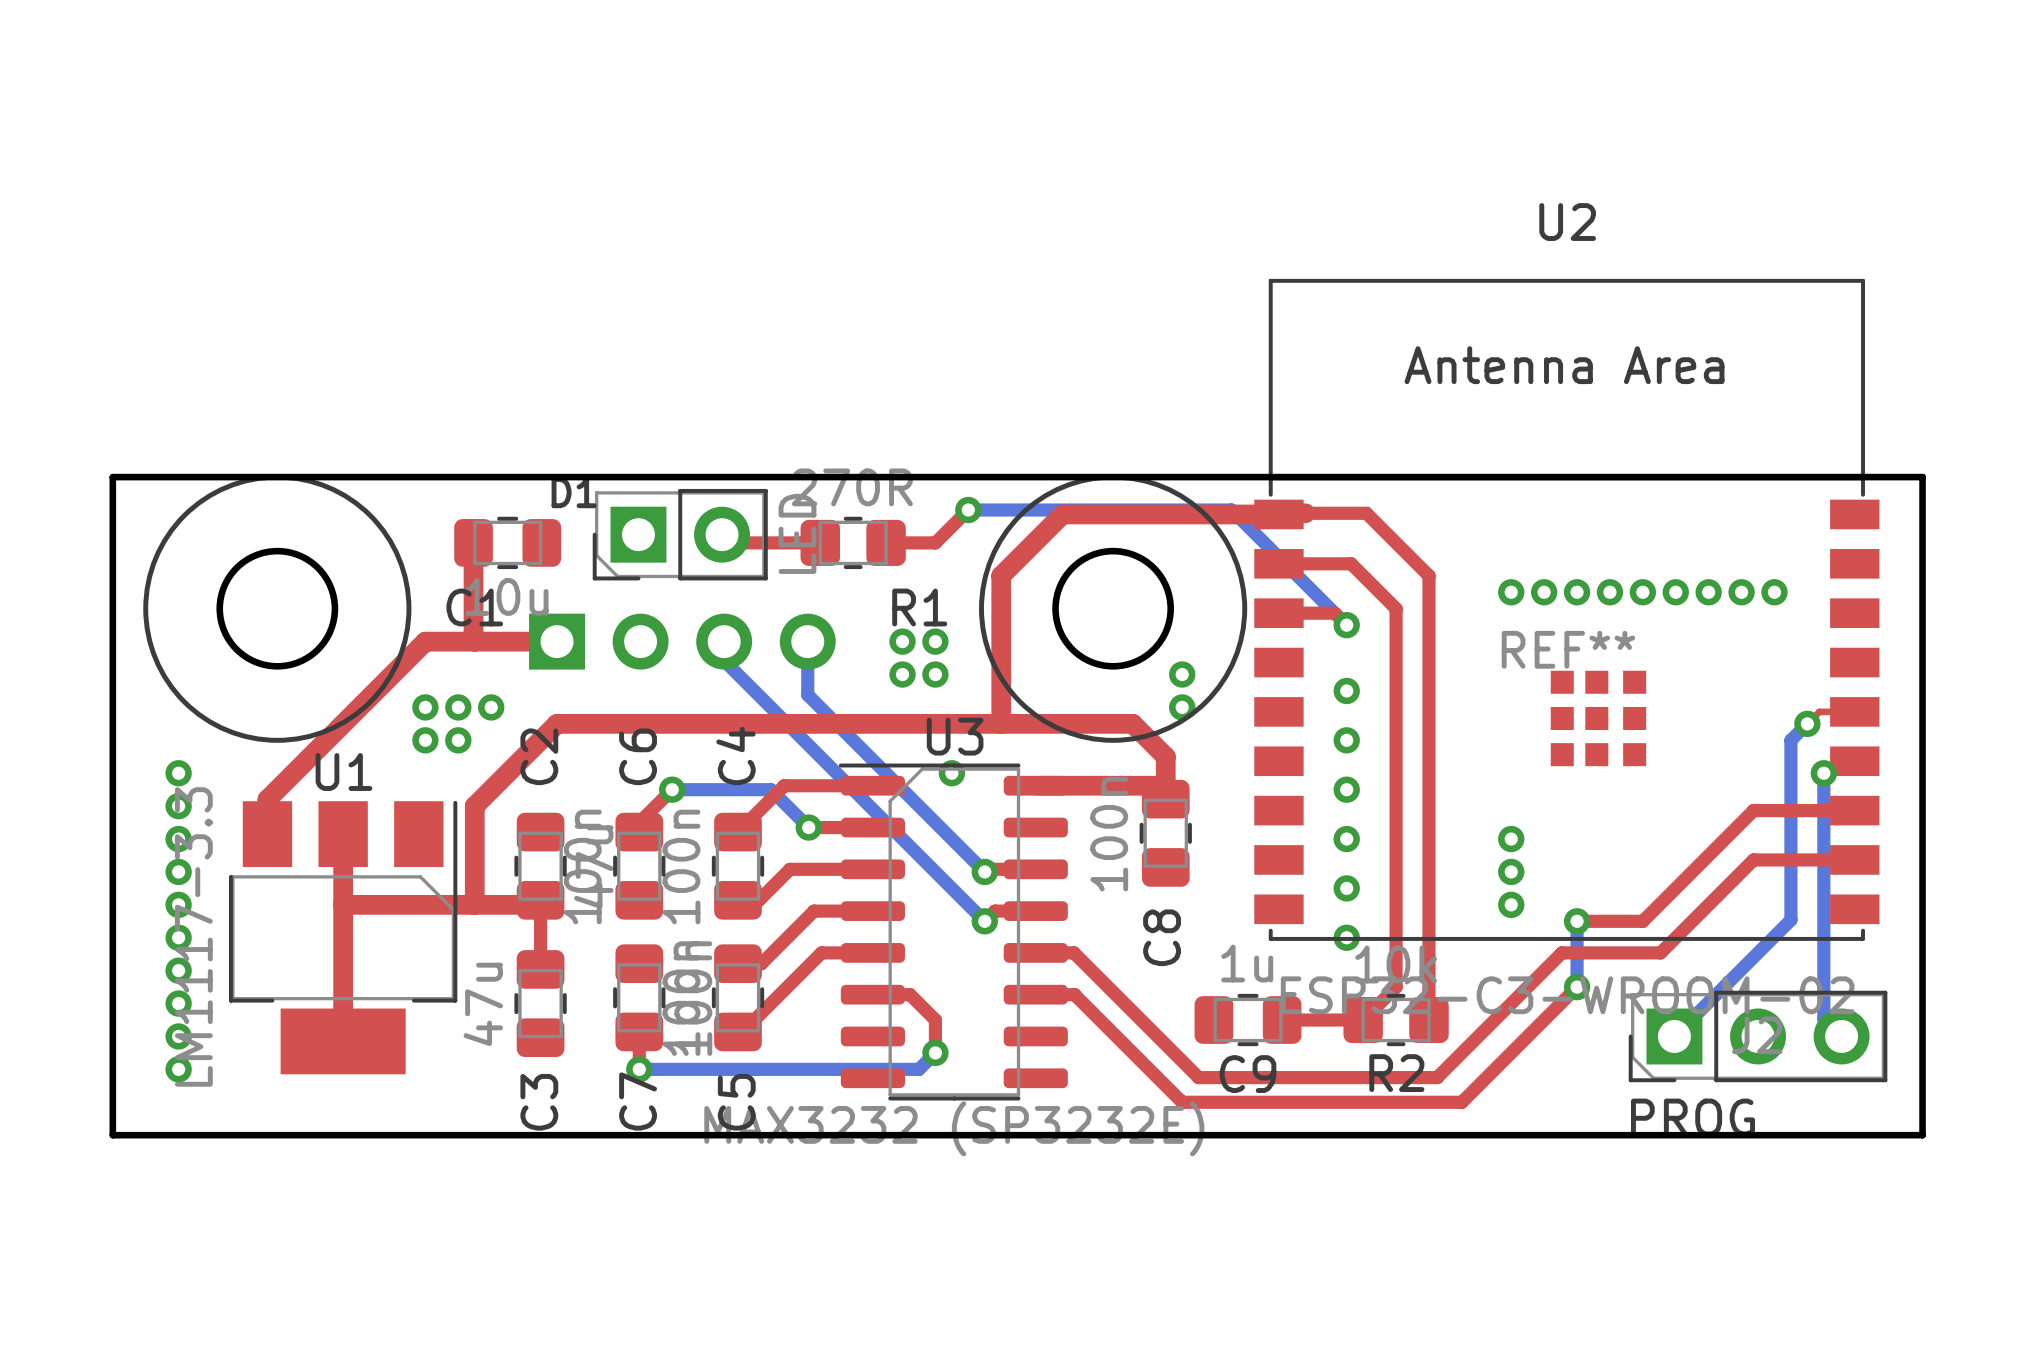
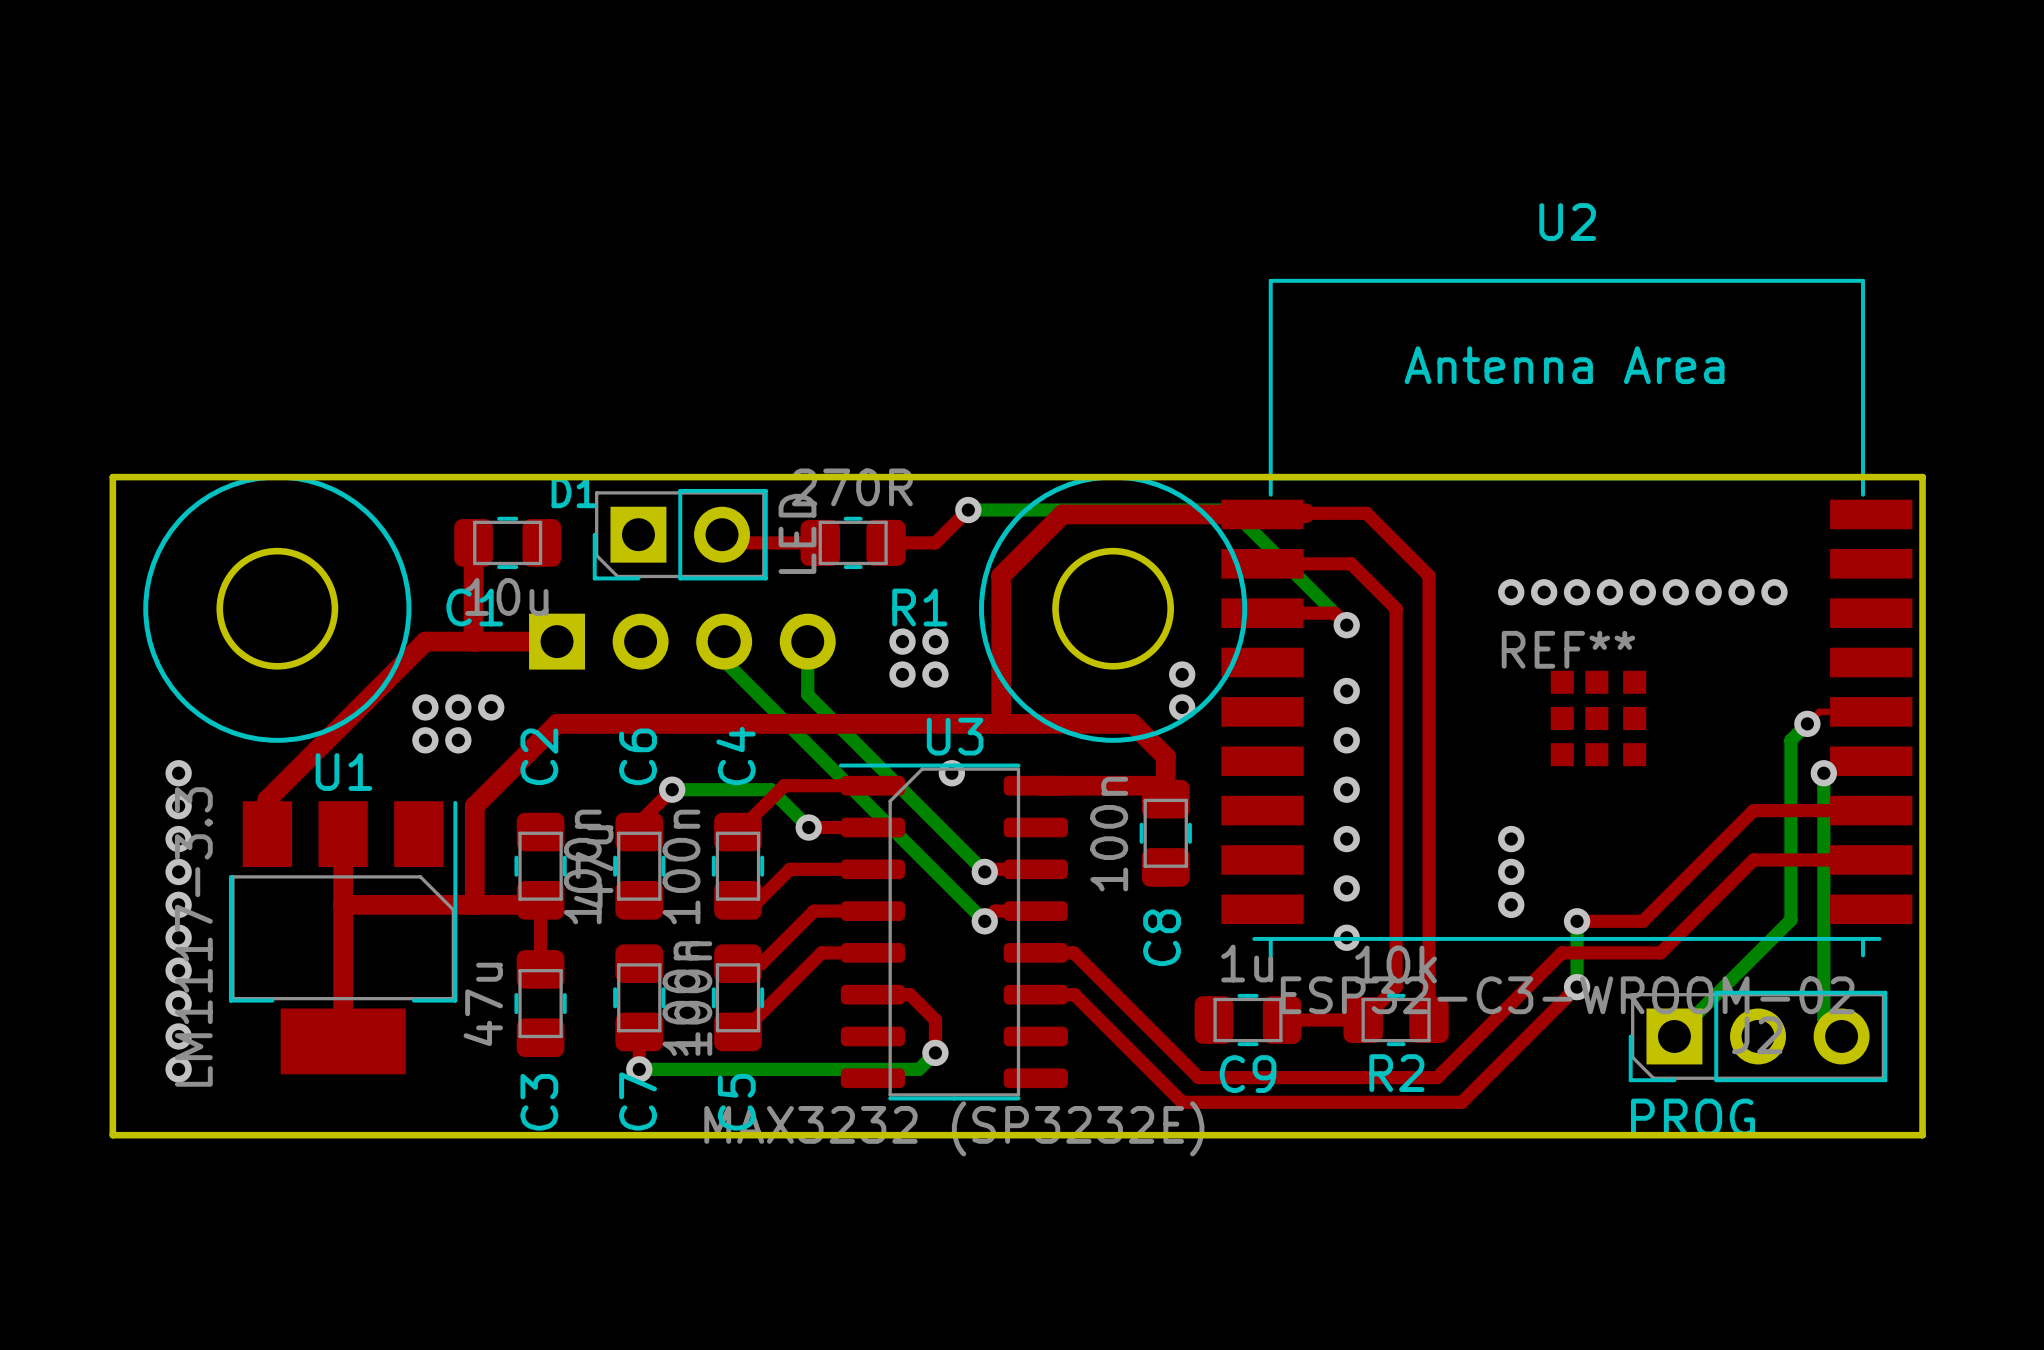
U2 footprint: [1254, 278, 1880, 941] -> [1221, 278, 1913, 958]

